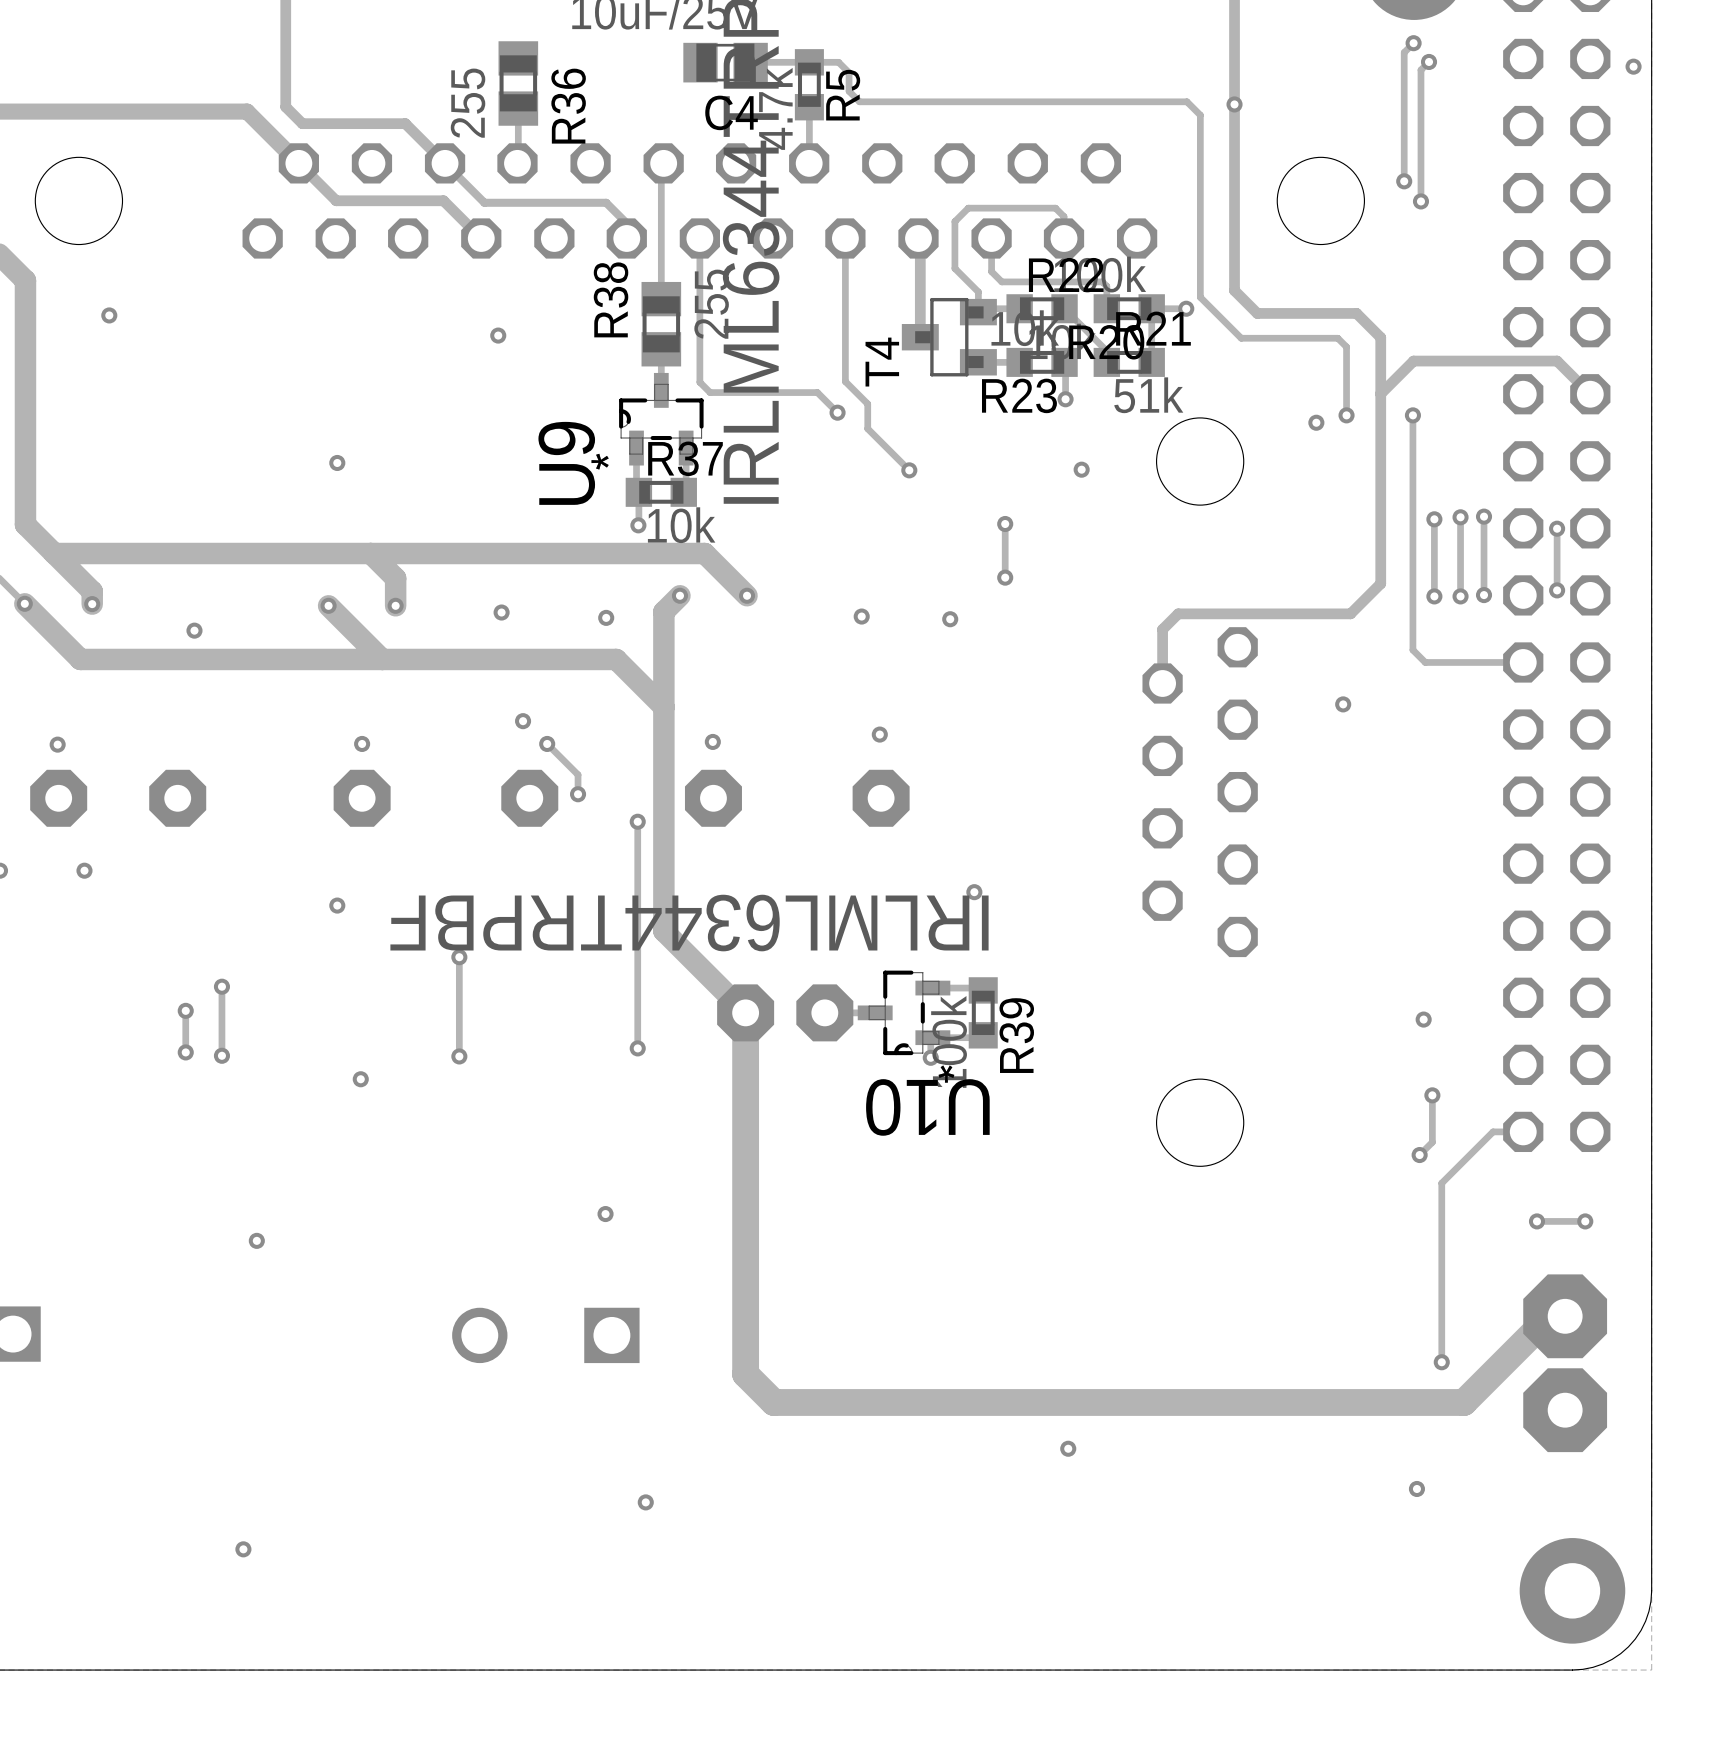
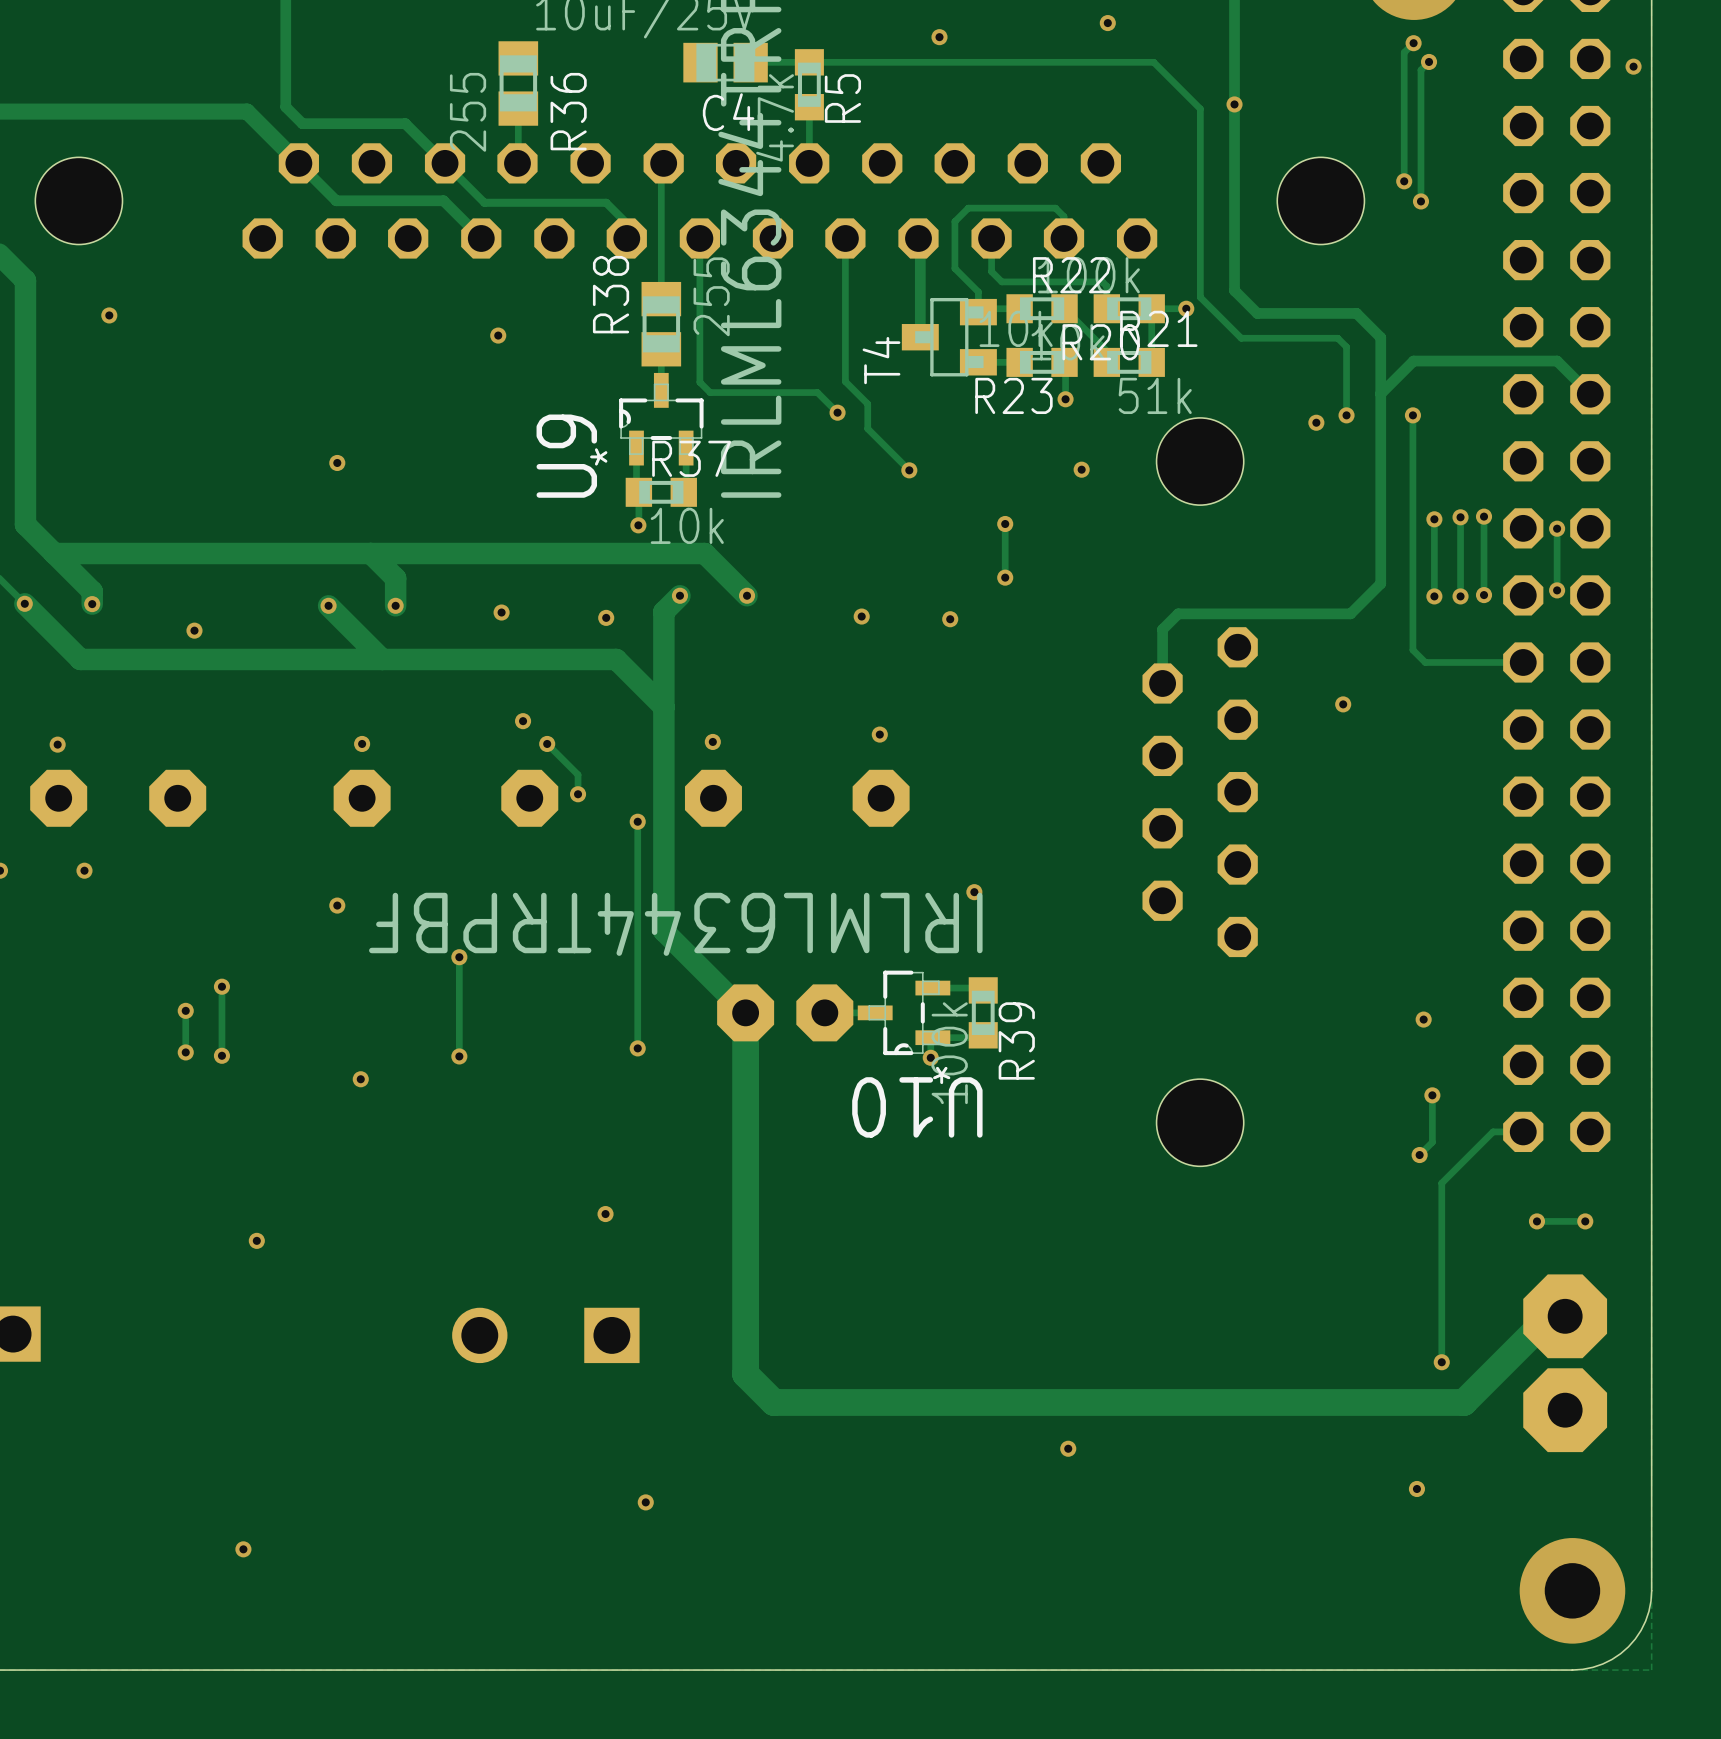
via: none -> (1107, 23)
via: none -> (939, 37)
track: (838, 62) (849, 72) (849, 91) (859, 101) (1187, 101) (1200, 115) -> (838, 62) (1153, 62) (1200, 108) (1200, 115)

